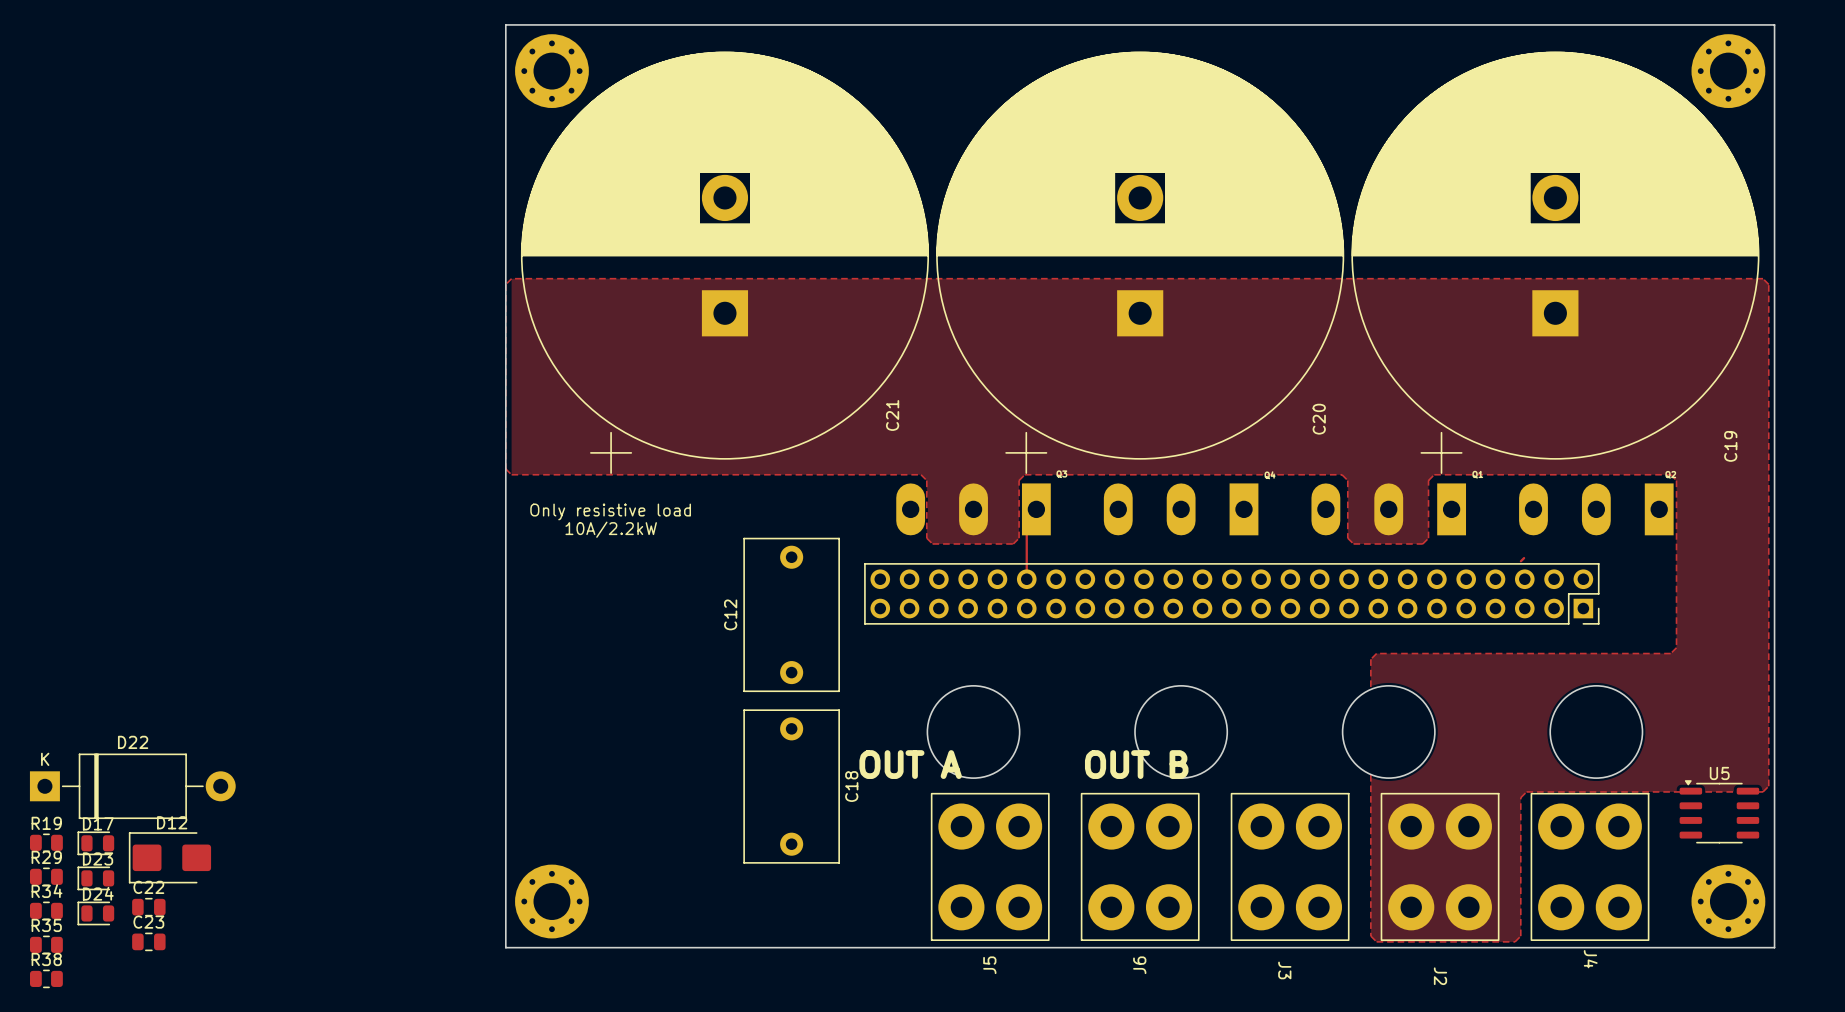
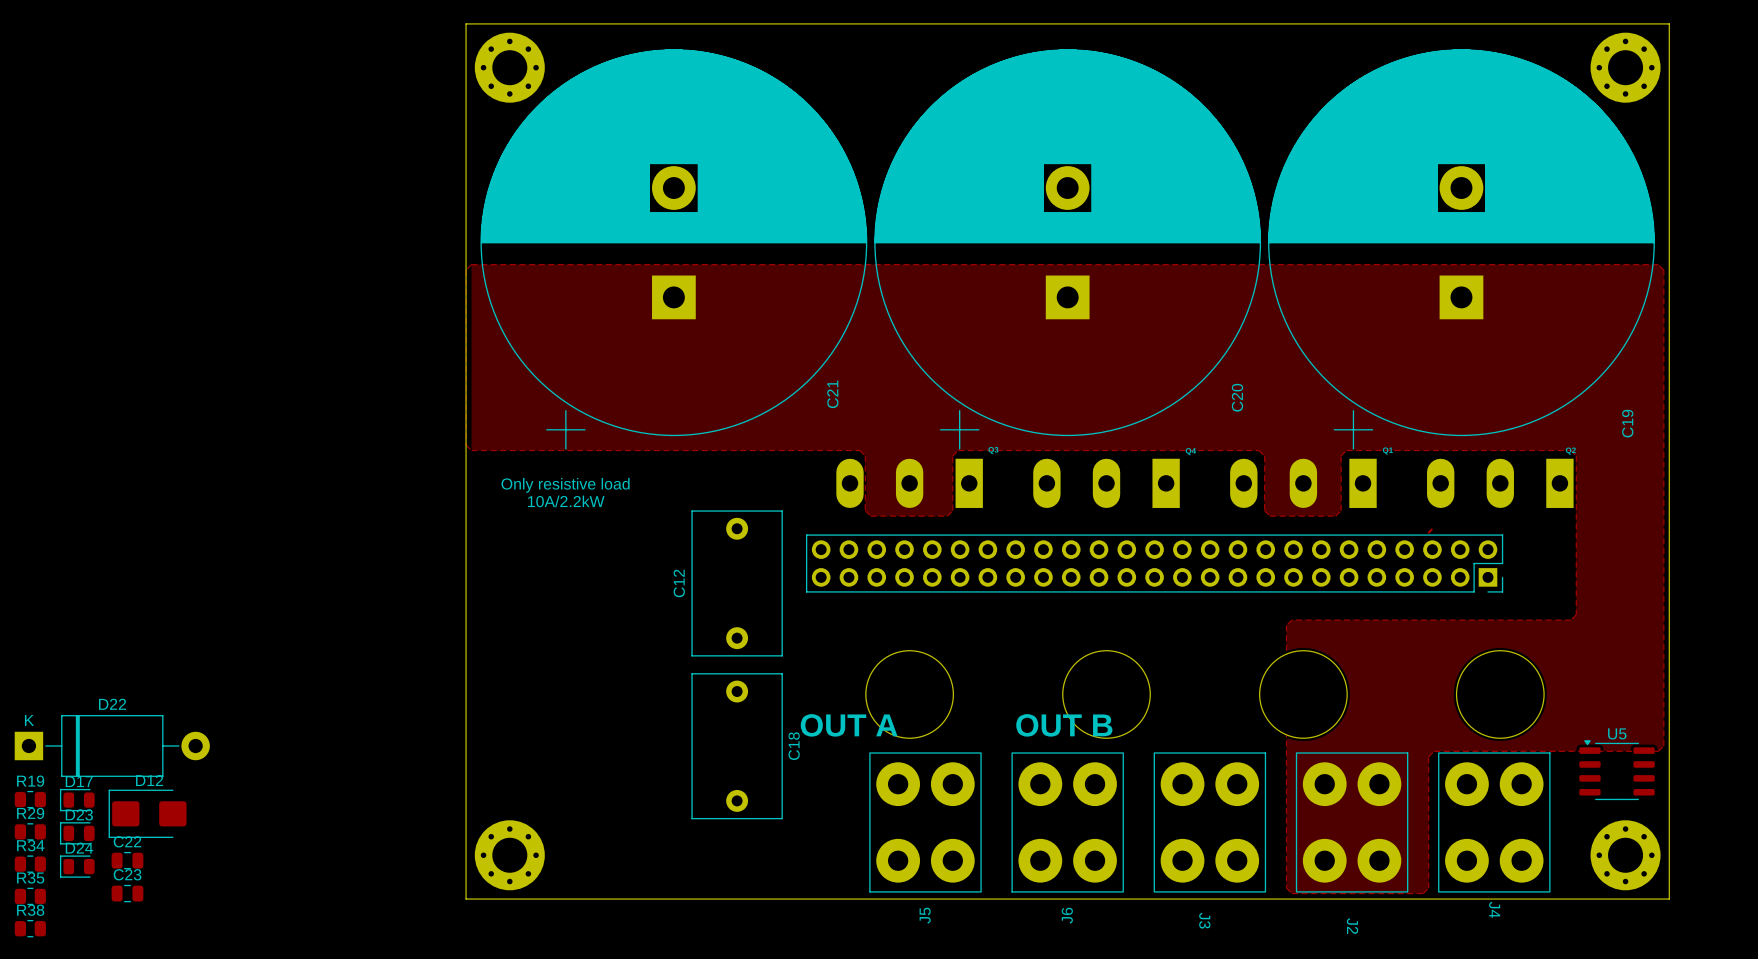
track: (1036, 509) (1026, 519) (1026, 579) -> none

